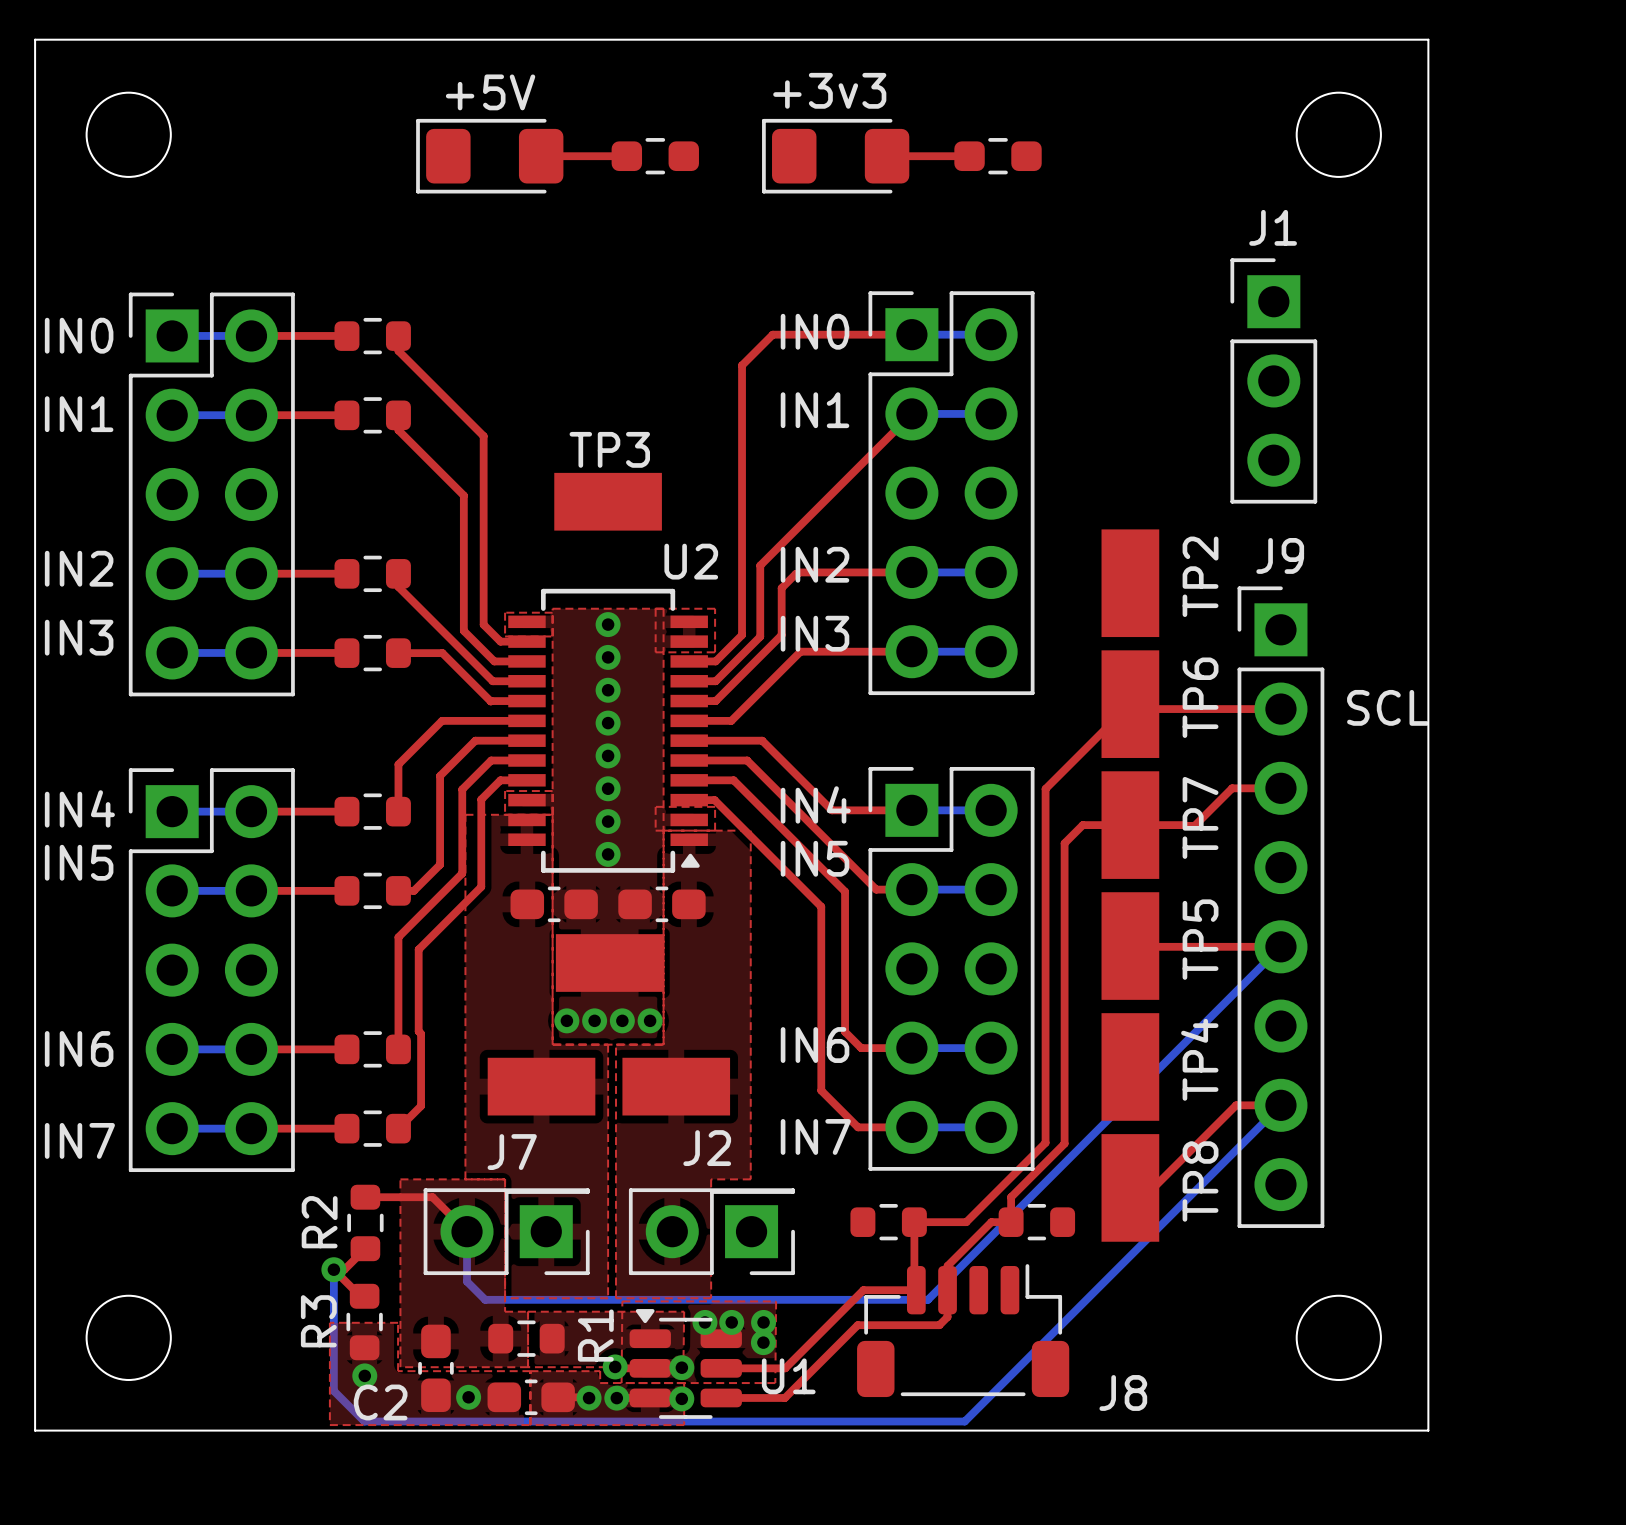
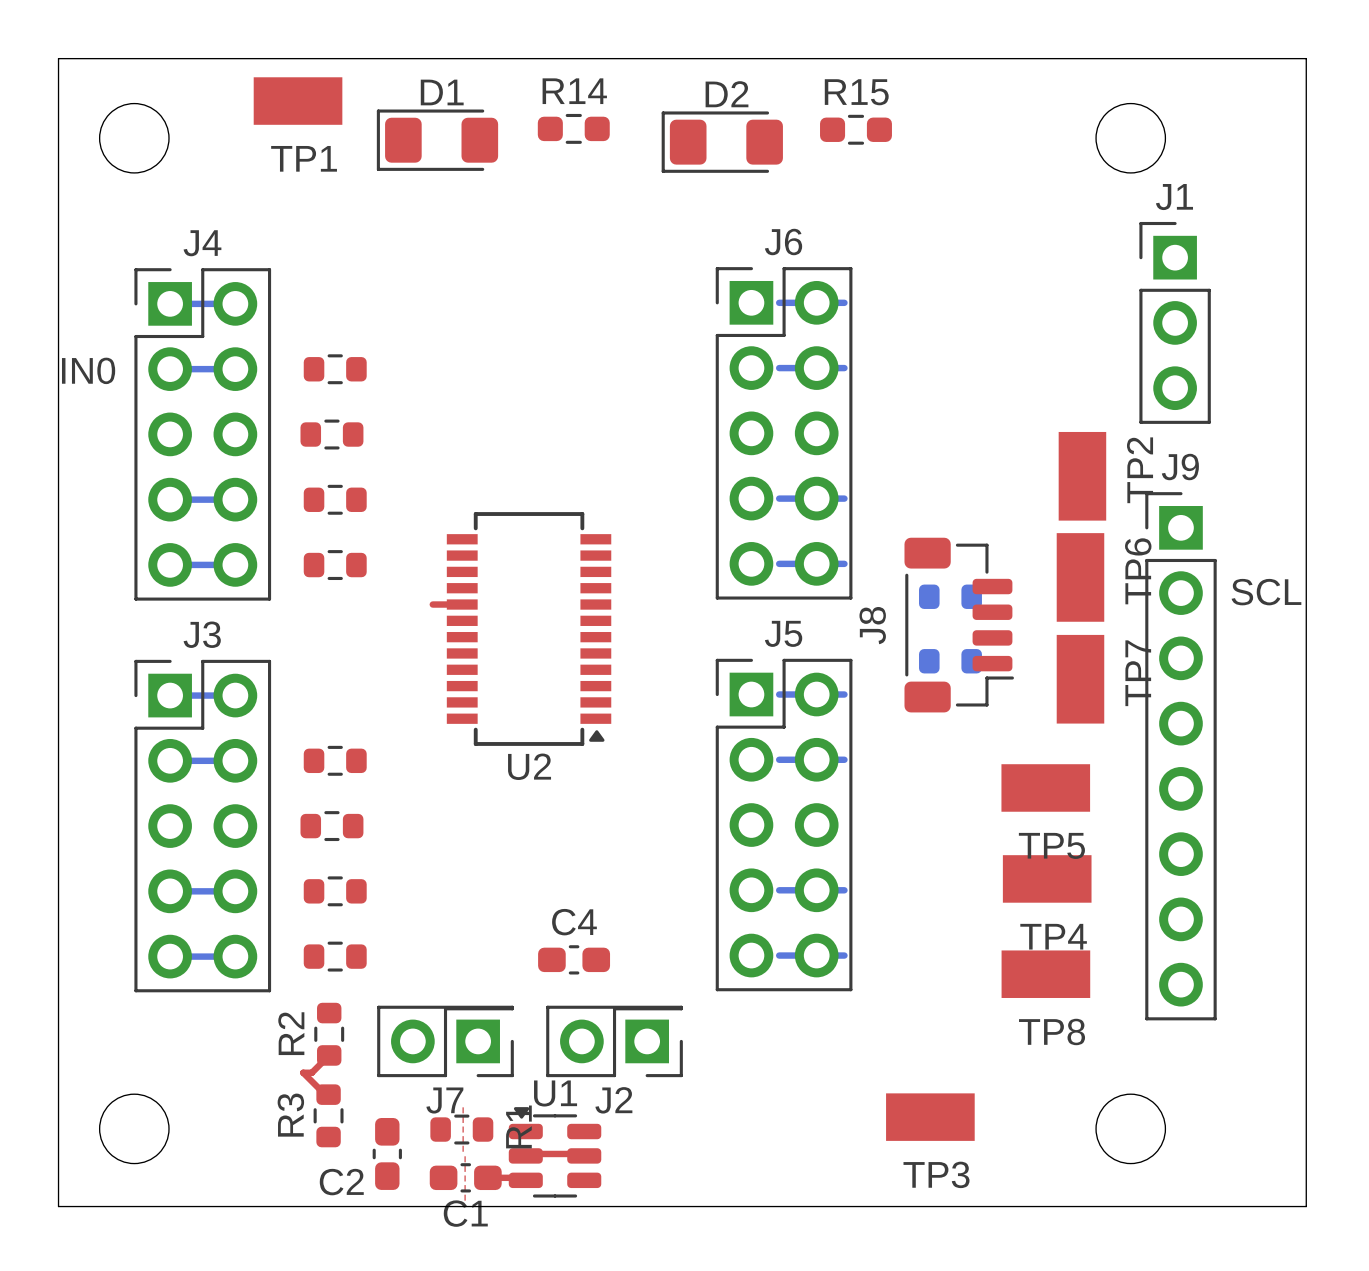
board edge: (35, 39) (1428, 39) (1428, 1430) (35, 1430) (35, 39) -> (58, 58) (58, 1206) (1306, 1206) (1306, 58) (58, 58)
D1 name: none -> D1 (442, 92)
D2 name: none -> D2 (727, 94)
TP1: none -> (298, 101)
text: +3v3 (829, 90) -> none
text: +5V (490, 92) -> none
R14: none -> (573, 128)
R15: none -> (855, 129)
D1 position: (489, 156) -> (437, 140)
top track: (541, 156) (626, 156) -> none
part: (655, 156) -> none
D2 position: (835, 156) -> (722, 142)
top track: (887, 156) (969, 156) -> none
part: (998, 156) -> none
J4 name: none -> J4 (202, 243)
text: IN0 (815, 331) -> none
top track: (911, 334) (772, 334) (742, 365) (742, 635) (715, 661) (689, 661) -> none
text position: IN0 (79, 335) -> IN0 (88, 370)
top track: (251, 335) (346, 335) -> none
part: (372, 336) -> none
top track: (398, 336) (398, 350) (483, 436) (483, 624) (500, 641) (526, 641) -> none
J1 position: (1273, 380) -> (1175, 322)
text: IN1 (815, 410) -> none
top track: (911, 413) (760, 565) (760, 636) (715, 681) (689, 681) -> none
text: IN1 (79, 414) -> none
top track: (251, 415) (346, 415) -> none
top track: (398, 415) (398, 430) (463, 495) (463, 630) (494, 661) (526, 661) -> none
TP3 name position: TP3 (609, 449) -> TP3 (936, 1174)
J6: none -> (784, 433)
part: (951, 493) -> none
part: none -> (331, 434)
TP3 position: (608, 501) -> (930, 1117)
U2 name position: U2 (691, 561) -> U2 (529, 766)
text: IN2 (815, 564) -> none
text: IN2 (79, 568) -> none
top track: (911, 572) (795, 573) (781, 588) (781, 635) (715, 701) (689, 701) -> none
top track: (251, 573) (346, 573) -> none
top track: (398, 573) (398, 586) (492, 681) (526, 681) -> none
TP2 position: (1130, 583) -> (1082, 476)
top zone outline: (655, 608) (655, 652) (715, 652) (715, 608) (552, 608) (552, 1044) (663, 1044) (663, 608) -> none
top zone outline: (552, 612) (505, 612) (505, 636) (552, 636) -> none
via: (608, 624) -> none
text: IN3 (815, 633) -> none
text: IN3 (79, 637) -> none
top track: (911, 651) (800, 651) (731, 720) (689, 720) -> none
top track: (251, 652) (346, 652) -> none
top track: (398, 653) (442, 653) (490, 701) -> none
via: (608, 657) -> none
via: (608, 690) -> none
TP6 position: (1130, 704) -> (1080, 577)
text position: SCL (1388, 707) -> SCL (1266, 592)
top track: (1280, 709) (1135, 709) (1130, 704) (1045, 788) (1045, 1142) (966, 1222) (914, 1222) (914, 1288) (916, 1290) (863, 1290) (785, 1368) (721, 1368) -> none
top track: (526, 720) (442, 720) (398, 764) (398, 811) -> none
via: (608, 723) -> none
J3 name: none -> J3 (202, 634)
top track: (526, 740) (475, 740) (440, 775) (440, 864) (413, 890) (398, 890) -> none
top track: (689, 740) (762, 740) (831, 810) (911, 810) -> none
via: (608, 755) -> none
top track: (526, 760) (491, 760) (462, 789) (462, 873) (398, 937) (398, 1049) -> none
top track: (689, 760) (747, 760) (876, 889) (911, 889) -> none
top track: (526, 780) (500, 780) (481, 799) (481, 886) (418, 949) (421, 1106) (398, 1128) -> none
top track: (689, 780) (733, 780) (845, 891) (845, 1031) (861, 1048) (911, 1048) -> none
via: (608, 788) -> none
top track: (1280, 788) (1232, 788) (1194, 825) (1082, 825) (1064, 843) (1064, 1143) (1011, 1197) (1011, 1222) (991, 1222) (947, 1266) (947, 1317) (939, 1325) (857, 1325) (784, 1397) (721, 1397) -> none
top zone outline: (552, 791) (505, 791) (505, 814) -> none
top track: (689, 800) (714, 800) (821, 906) (821, 1090) (858, 1127) (911, 1127) -> none
text: IN4 (815, 804) -> none
text: IN4 (79, 808) -> none
top track: (251, 811) (346, 811) -> none
part: (372, 811) -> none
top zone outline: (552, 814) (465, 814) (465, 1179) -> none
via: (608, 821) -> none
TP7 position: (1130, 825) -> (1080, 679)
top zone outline: (715, 830) (715, 806) (655, 806) (655, 830) (750, 830) (750, 1179) (711, 1179) (711, 1298) (616, 1298) (616, 1044) -> none
via: (608, 854) -> none
text: IN5 (815, 858) -> none
text: IN5 (79, 862) -> none
top track: (251, 890) (346, 890) -> none
part: (554, 904) -> none
part: (661, 904) -> none
J9 position: (1280, 907) -> (1180, 756)
top track: (1130, 946) (1280, 946) -> none
TP5 rotation: 0° (1130, 946) -> 90° clockwise (1045, 787)
TP5 position: (1130, 946) -> (1045, 787)
bottom track: (1280, 946) (927, 1299) (485, 1299) (467, 1281) (467, 1231) -> none
part: (609, 963) -> none
J5: none -> (784, 825)
part: (951, 968) -> none
part: none -> (331, 826)
via: (566, 1020) -> none
via: (594, 1020) -> none
via: (622, 1020) -> none
via: (650, 1020) -> none
top zone outline: (608, 1044) (608, 1298) (505, 1298) -> none
text: IN6 (815, 1045) -> none
text: IN6 (79, 1048) -> none
top track: (251, 1049) (346, 1049) -> none
TP4 rotation: 0° (1130, 1066) -> 90° clockwise (1047, 878)
TP4 position: (1130, 1066) -> (1047, 878)
part: (541, 1086) -> none
part: (676, 1086) -> none
top track: (1280, 1105) (1236, 1105) (1153, 1187) (1130, 1187) -> none
bottom track: (1280, 1105) (964, 1421) (364, 1421) (333, 1390) (333, 1269) -> none
top track: (251, 1128) (346, 1128) -> none
C4: none -> (574, 959)
text: IN7 (815, 1136) -> none
text: IN7 (79, 1140) -> none
J2 name position: J2 (707, 1148) -> J2 (613, 1100)
J7 name position: J7 (512, 1152) -> J7 (444, 1100)
top zone outline: (400, 1179) (505, 1179) (505, 1311) (684, 1311) (683, 1367) (400, 1367) (400, 1179) -> none
TP8 rotation: 0° (1130, 1187) -> 90° clockwise (1045, 974)
TP8 position: (1130, 1187) -> (1045, 974)
top track: (365, 1197) (432, 1197) (467, 1231) -> none
part side: top (888, 1222) -> bottom (950, 596)
part side: top (1036, 1222) -> bottom (950, 661)
via: (333, 1269) -> none
via: (704, 1322) -> none
via: (731, 1322) -> none
via: (763, 1322) -> none
J8 rotation: 0° (963, 1330) -> 90° clockwise (959, 625)
J8 position: (963, 1330) -> (959, 625)
via: (763, 1342) -> none
U1 position: (685, 1363) -> (555, 1152)
via: (615, 1366) -> none
via: (681, 1367) -> none
via: (364, 1375) -> none
U1 name position: U1 (788, 1376) -> U1 (555, 1093)
top zone outline: (621, 1383) (622, 1301) (776, 1301) (775, 1383) (600, 1383) (600, 1371) (398, 1371) (398, 1322) (329, 1322) (329, 1425) (684, 1425) (684, 1383) -> none
J8 name position: J8 (1123, 1392) -> J8 (872, 625)
via: (468, 1397) -> none
via: (589, 1398) -> none
via: (616, 1398) -> none
via: (681, 1398) -> none
C1 name: none -> C1 (465, 1213)

